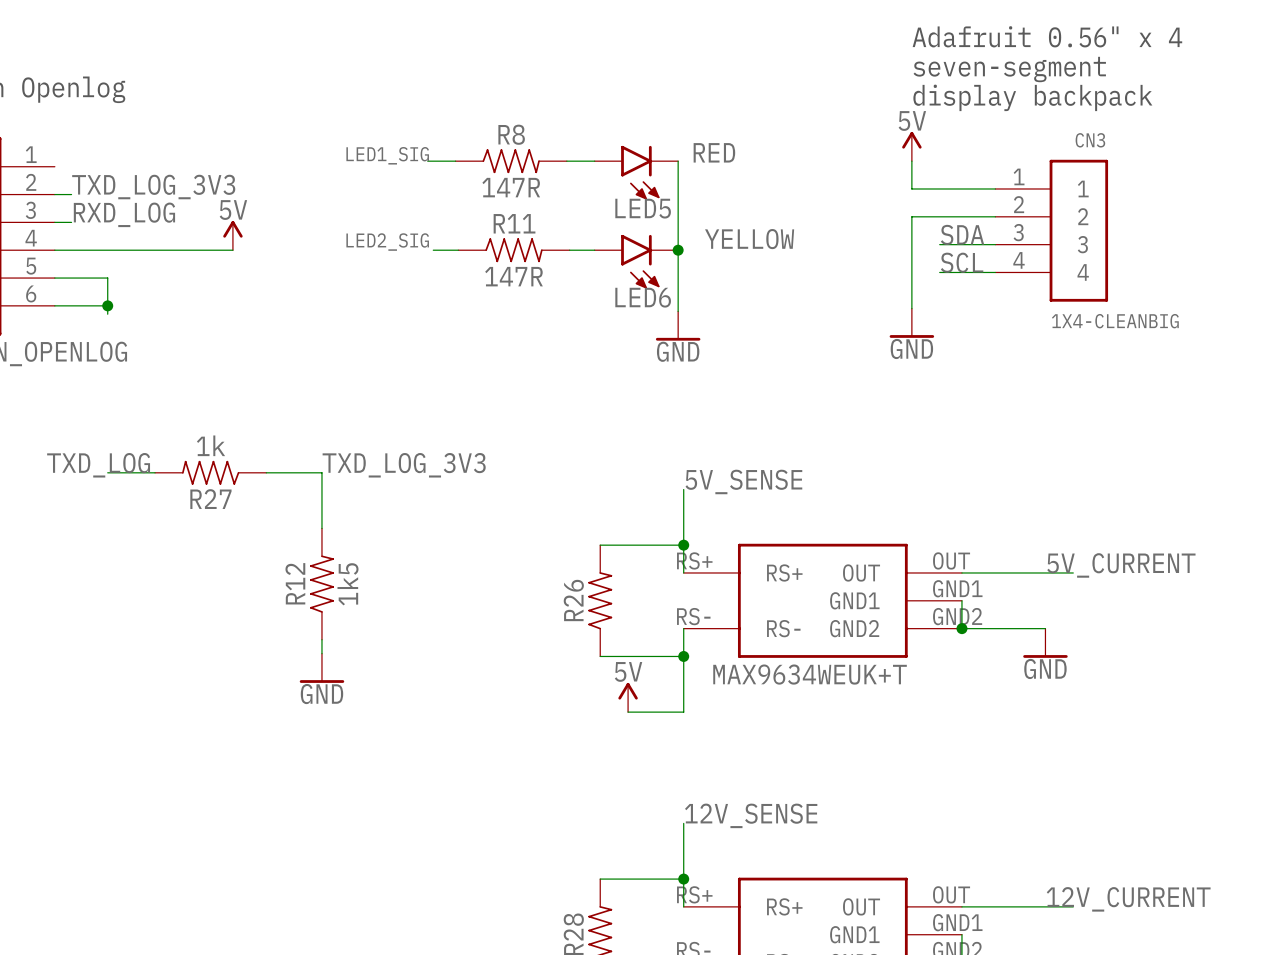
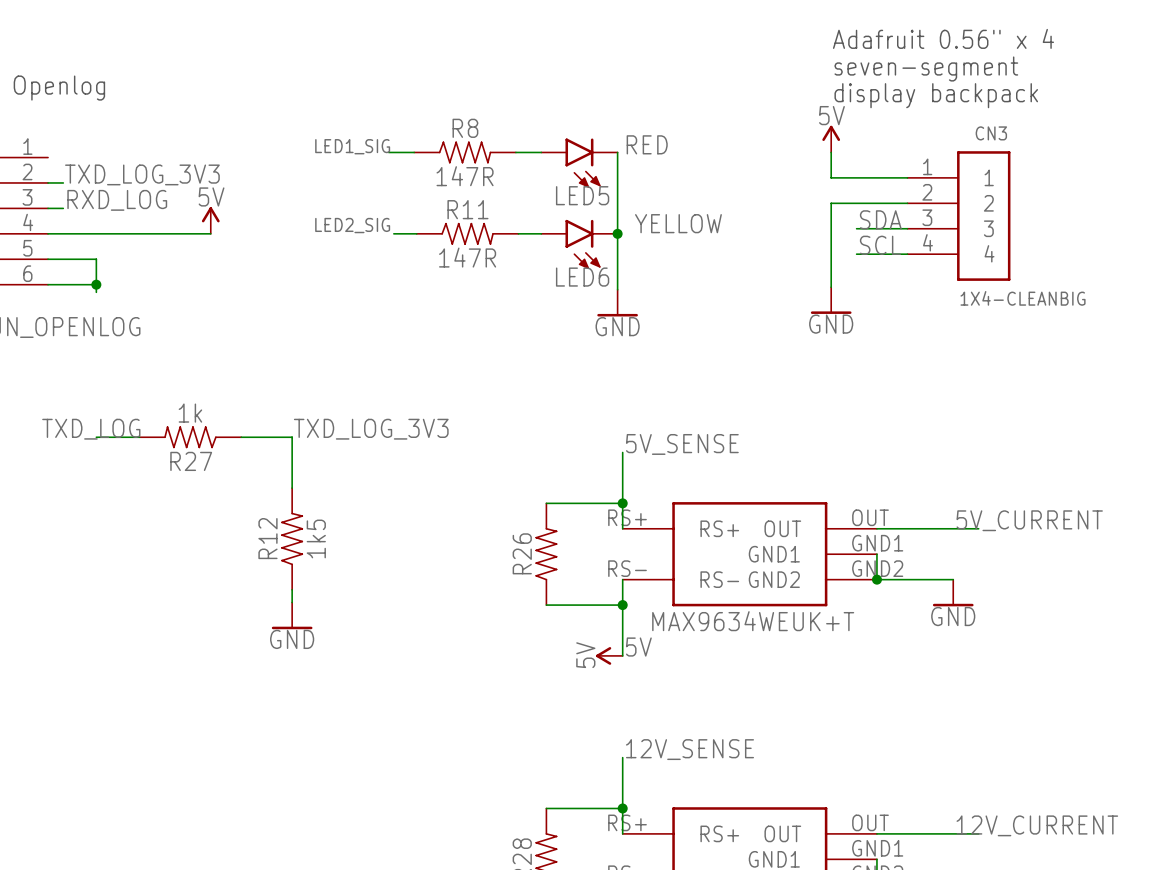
power symbol rotation: 0° (628, 691) -> 90° counterclockwise (603, 655)
power symbol position: 5V (628, 697) -> 5V (609, 655)
label: none -> 5V (638, 647)

